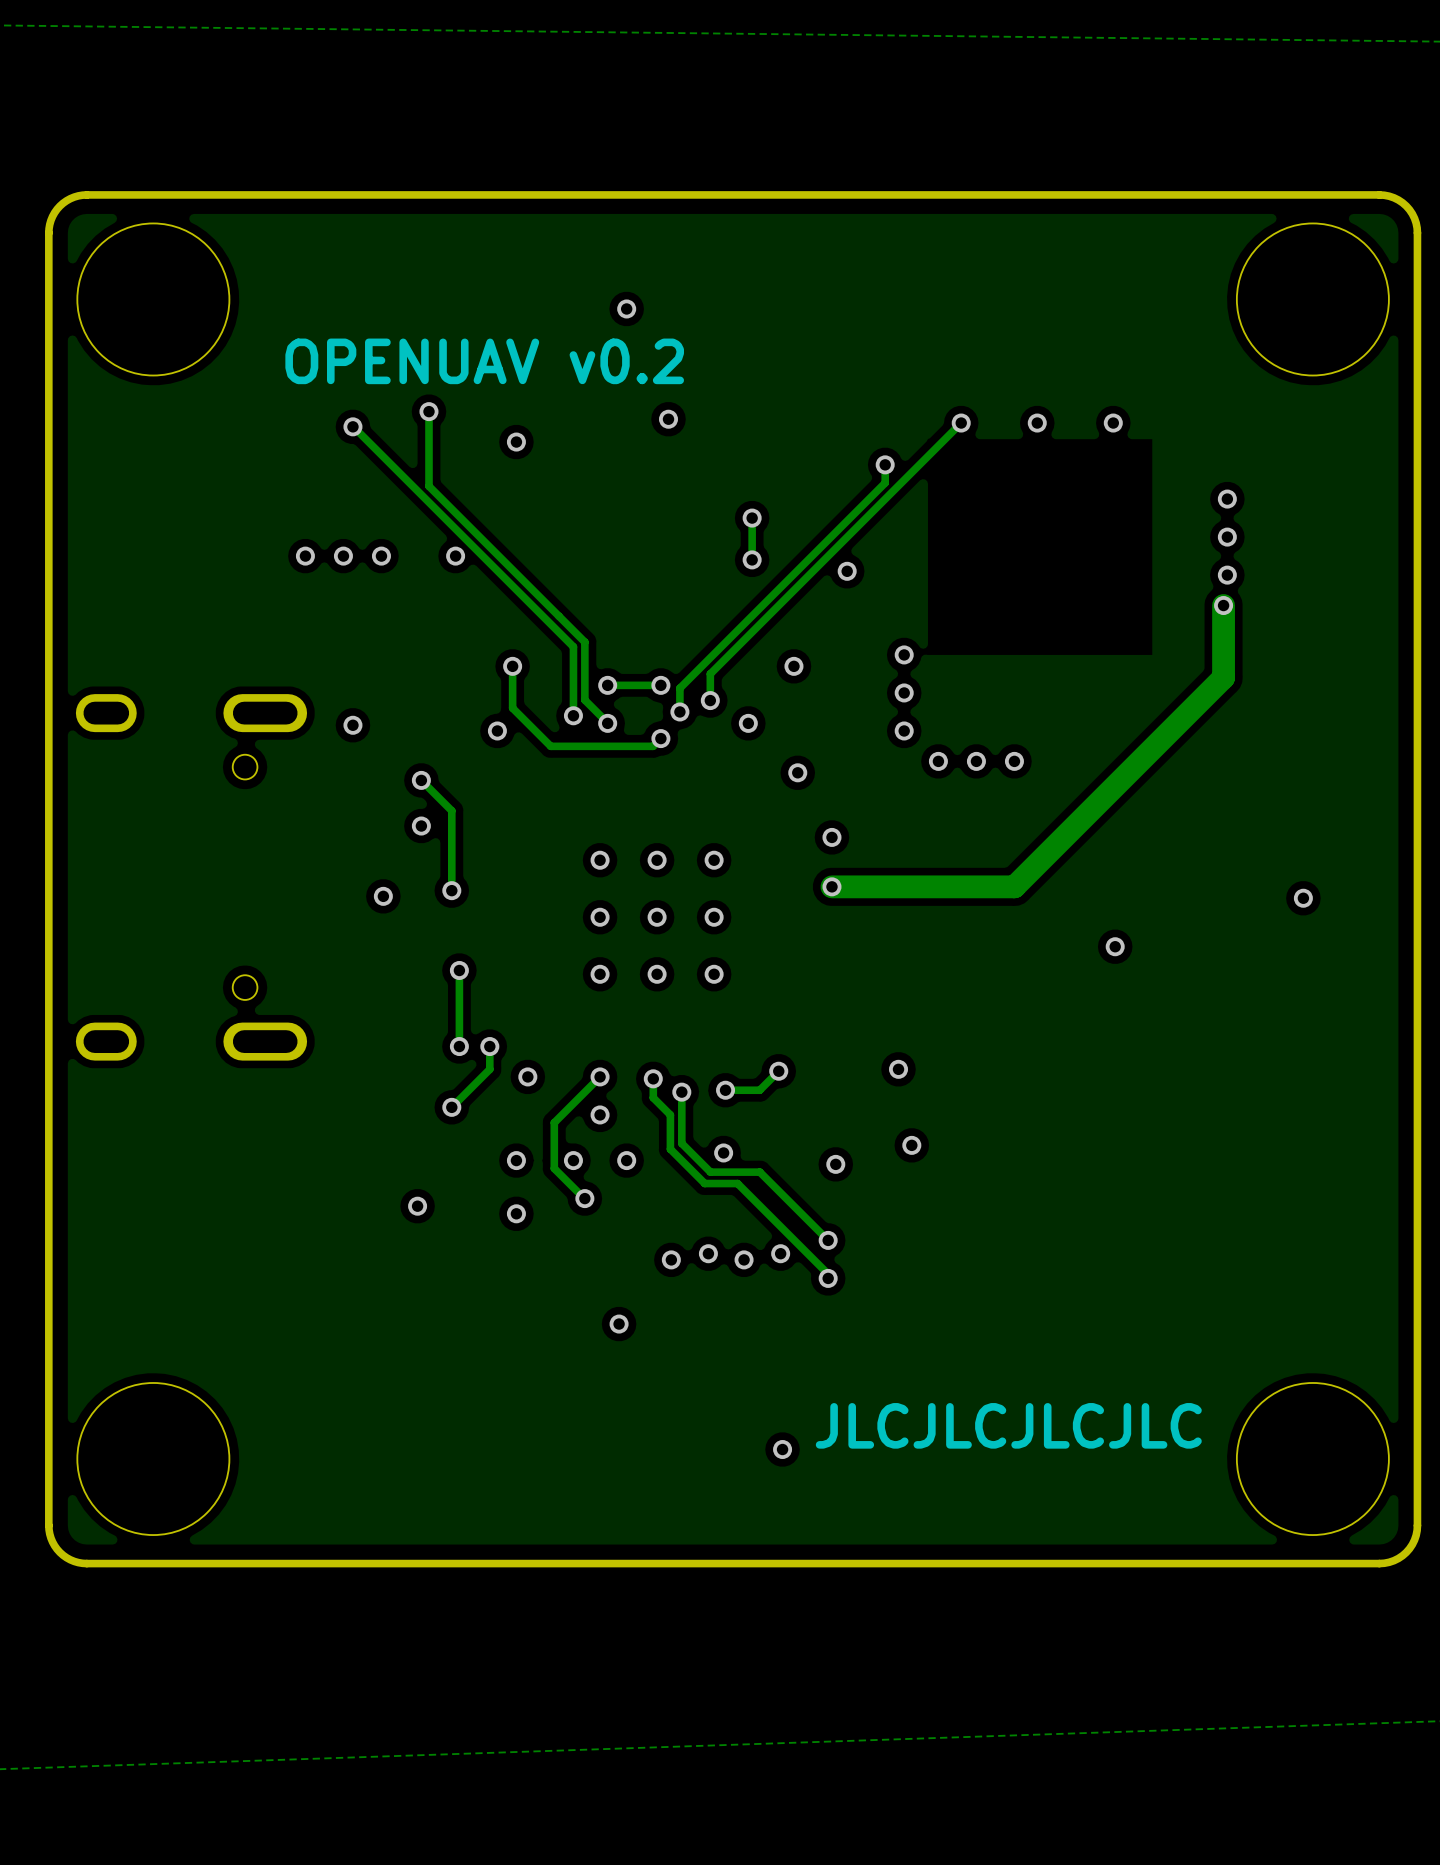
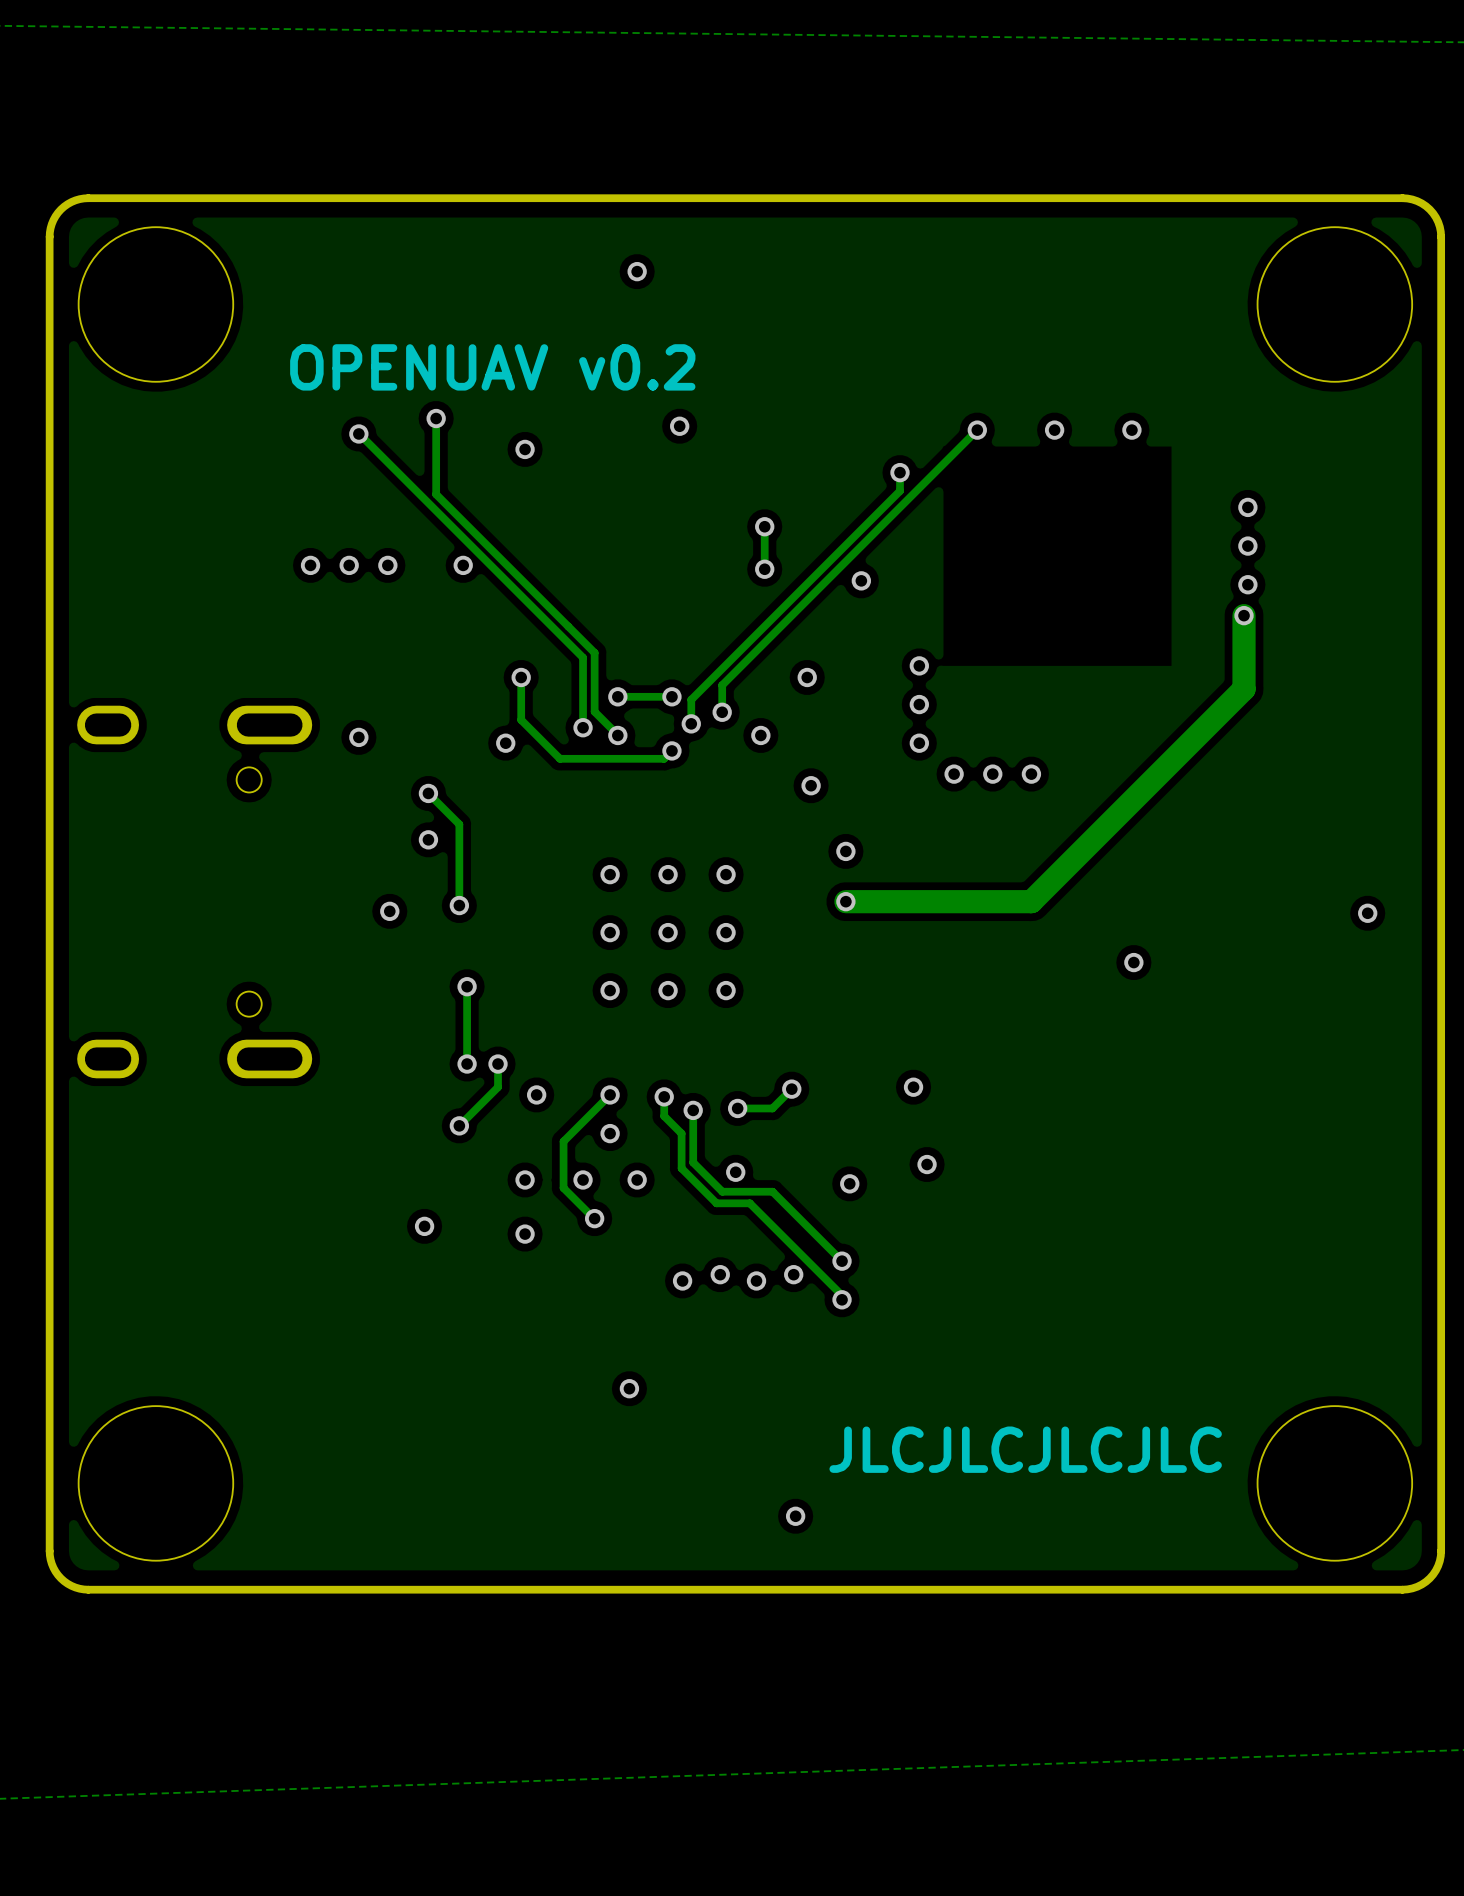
via position: (626, 308) -> (637, 271)
via position: (1303, 898) -> (1367, 913)
via position: (619, 1324) -> (629, 1388)
via position: (782, 1449) -> (795, 1516)

